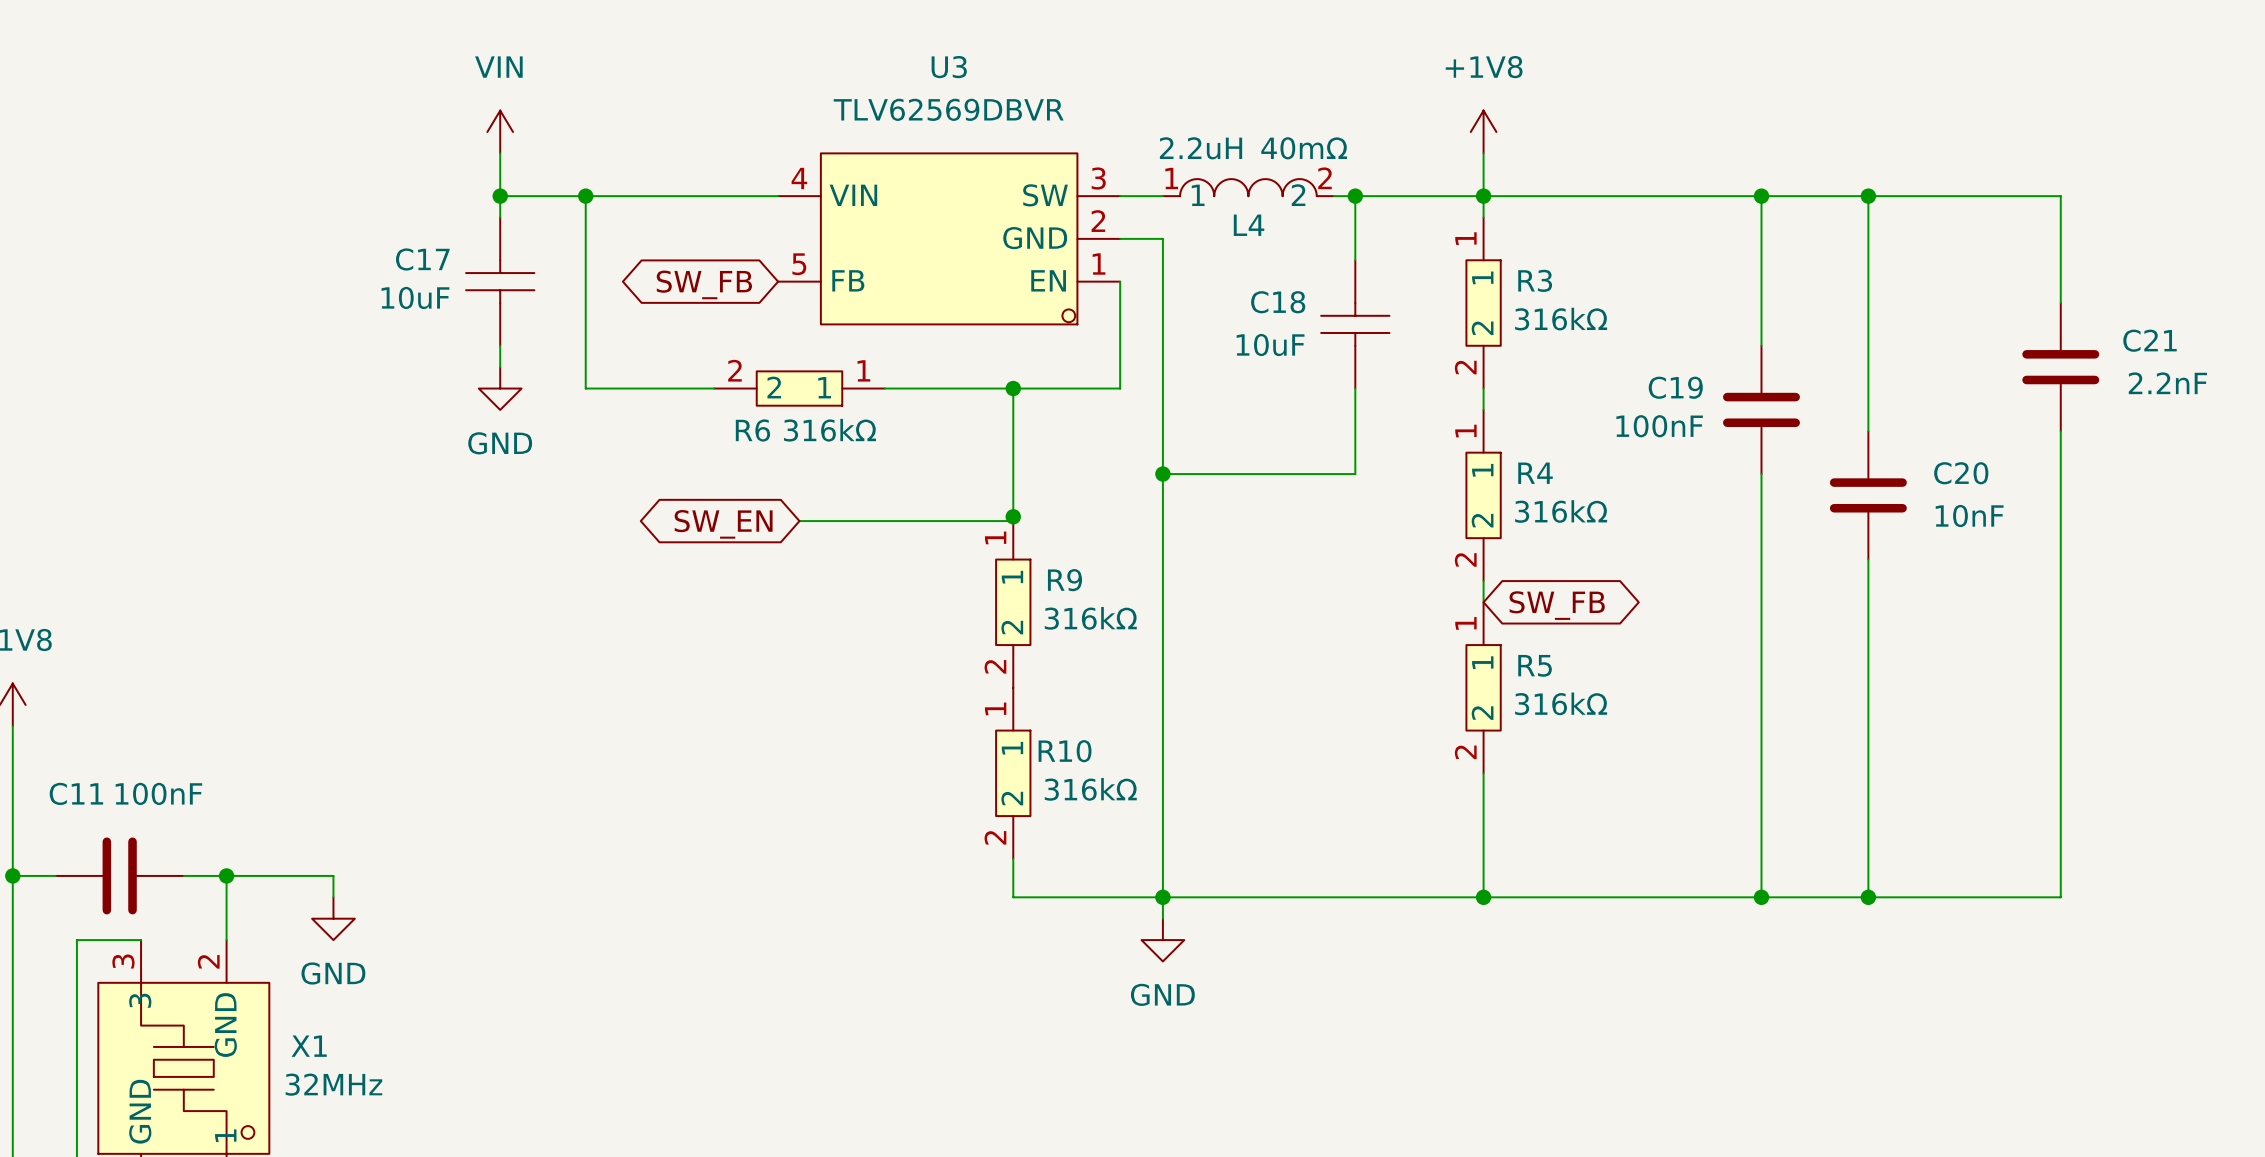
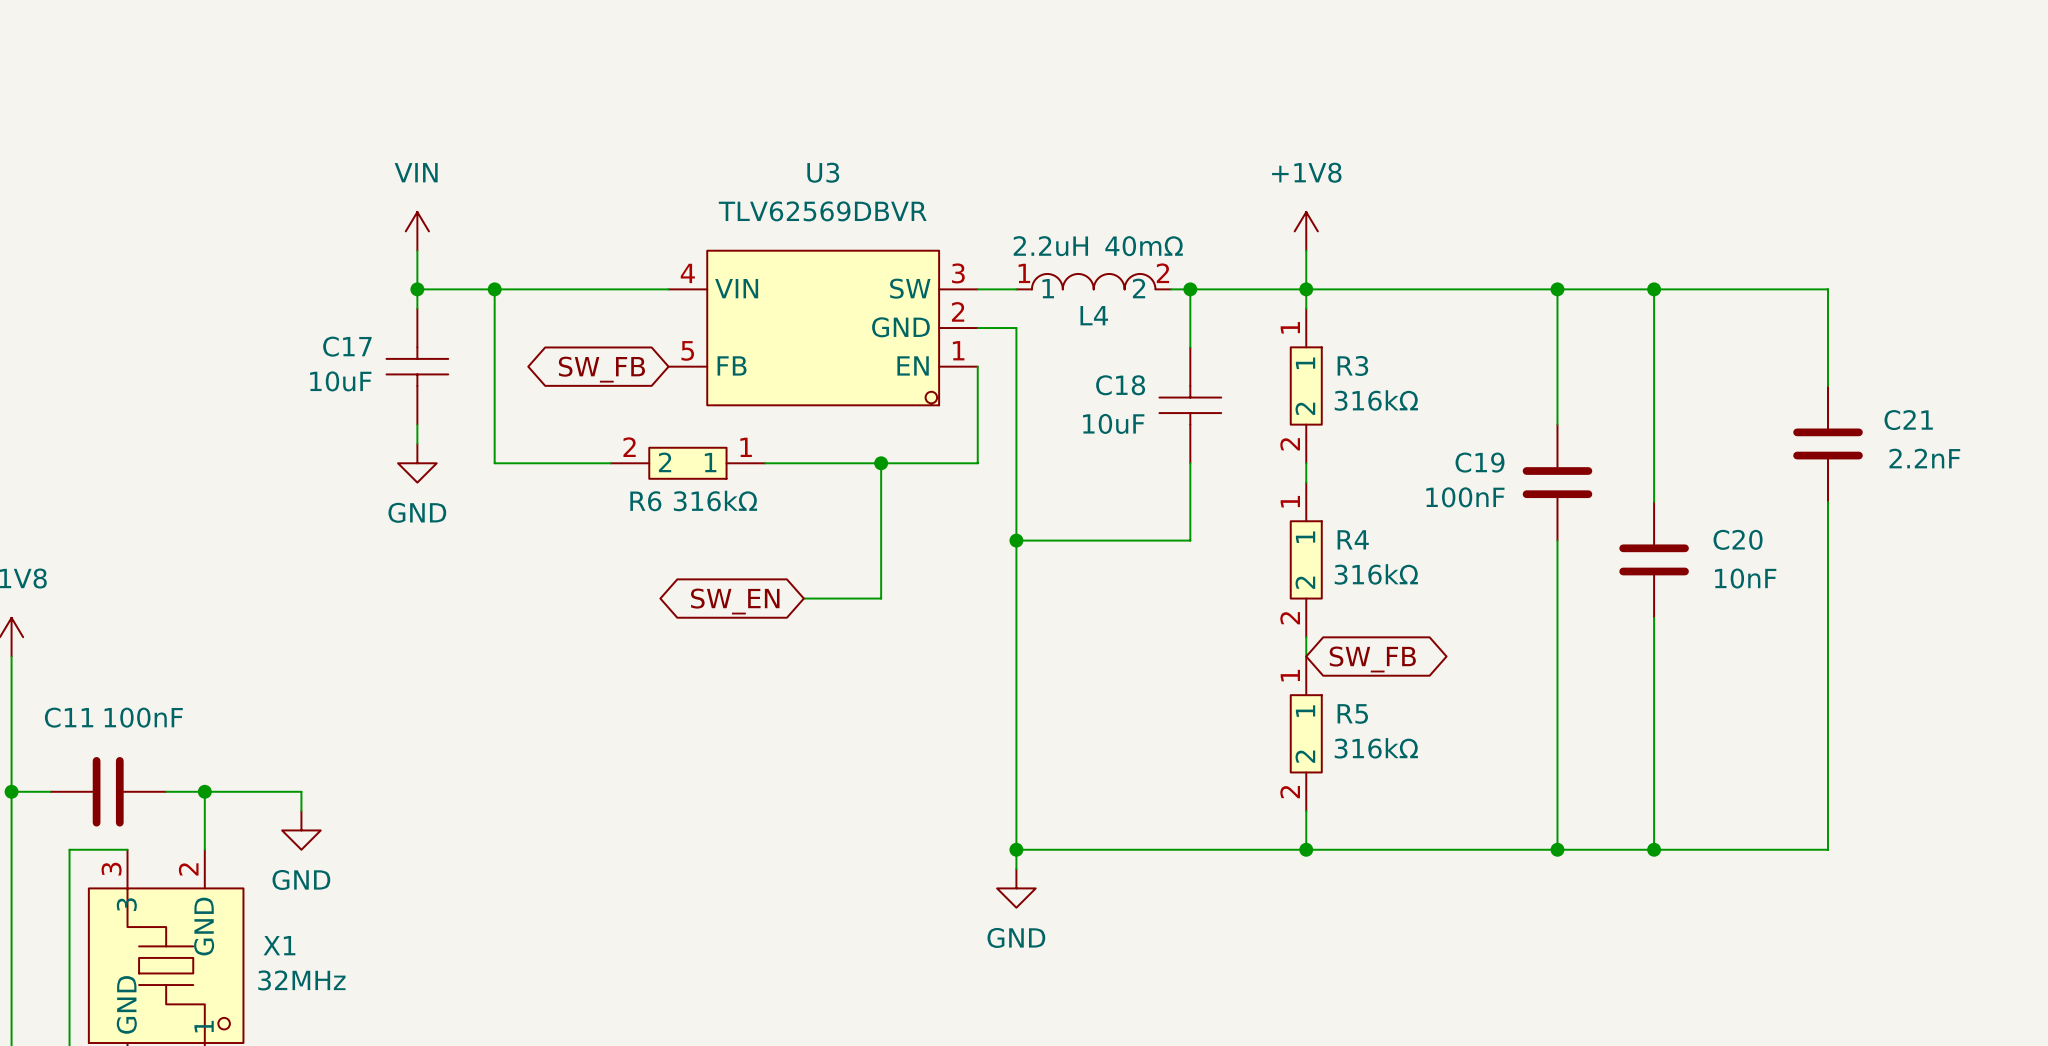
power symbol position: VIN (500, 132) -> VIN (417, 231)
power symbol position: +1V8 (1483, 132) -> +1V8 (1306, 231)
wire: (500, 153) (500, 217) -> (417, 250) (417, 308)
wire: (1483, 153) (1483, 217) -> (1306, 250) (1306, 308)
L4 position: (1248, 187) -> (1093, 281)
wire: (500, 196) (778, 196) -> (417, 289) (668, 289)
junction: (500, 196) -> none
wire: (585, 196) (585, 388) (713, 388) -> (494, 289) (494, 463) (610, 463)
junction: (585, 196) -> none
wire: (1120, 196) (1162, 196) -> (977, 289) (1016, 289)
wire: (1333, 196) (2060, 196) (2060, 303) -> (1171, 289) (1828, 289) (1828, 385)
wire: (1355, 196) (1355, 260) -> (1190, 289) (1190, 347)
junction: (1355, 196) -> none
junction: (1483, 196) -> none
wire: (1761, 196) (1761, 345) -> (1557, 289) (1557, 424)
junction: (1761, 196) -> none
wire: (1868, 196) (1868, 431) -> (1654, 289) (1654, 501)
junction: (1868, 196) -> none
U3 position: (949, 238) -> (823, 328)
wire: (1120, 238) (1162, 238) (1162, 918) -> none
C17 position: (500, 281) -> (417, 366)
wire: (1120, 281) (1120, 388) (885, 388) -> (977, 366) (977, 463) (765, 463)
global label position: SW_FB (704, 284) -> SW_FB (601, 369)
R3 position: (1483, 303) -> (1306, 385)
junction: none -> (417, 289)
junction: none -> (494, 289)
junction: none -> (1190, 289)
junction: none -> (1306, 289)
junction: none -> (1557, 289)
junction: none -> (1654, 289)
C18 position: (1355, 324) -> (1190, 405)
wire: (500, 345) (500, 367) -> (417, 424) (417, 443)
wire: none -> (977, 328) (1016, 328) (1016, 869)
C21 position: (2060, 367) -> (1828, 443)
power symbol position: GND (500, 388) -> GND (417, 463)
R6 position: (799, 388) -> (687, 463)
wire: (1013, 388) (1013, 521) (799, 521) -> none
junction: (1013, 388) -> none
wire: (1355, 388) (1355, 474) (1162, 474) -> (1190, 463) (1190, 540) (1016, 540)
wire: (1483, 388) (1483, 409) -> (1306, 463) (1306, 482)
C19 position: (1761, 409) -> (1557, 482)
wire: (2060, 431) (2060, 897) (1013, 897) (1013, 858) -> none
junction: (1162, 474) -> none
wire: (1761, 474) (1761, 897) -> none
R4 position: (1483, 495) -> (1306, 559)
C20 position: (1868, 495) -> (1654, 559)
wire: none -> (881, 463) (881, 598) (803, 598)
junction position: (1013, 516) -> (881, 463)
global label position: SW_EN (723, 524) -> SW_EN (735, 601)
wire: none -> (1828, 501) (1828, 849) (1016, 849)
wire: (1868, 559) (1868, 897) -> none
wire: (1483, 580) (1483, 602) -> (1306, 637) (1306, 656)
junction: none -> (1016, 540)
wire: none -> (1557, 540) (1557, 849)
R9: (1013, 602) -> none
global label position: SW_FB (1557, 605) -> SW_FB (1372, 659)
wire: none -> (1654, 617) (1654, 849)
R5 position: (1483, 687) -> (1306, 733)
R10: (1013, 773) -> none
wire: (1483, 773) (1483, 897) -> none
junction position: (1162, 897) -> (1016, 849)
wire: none -> (1306, 811) (1306, 849)
junction position: (1483, 897) -> (1306, 849)
junction: (1761, 897) -> none
junction: (1868, 897) -> none
power symbol position: GND (1162, 940) -> GND (1016, 888)
junction: none -> (1557, 849)
junction: none -> (1654, 849)

